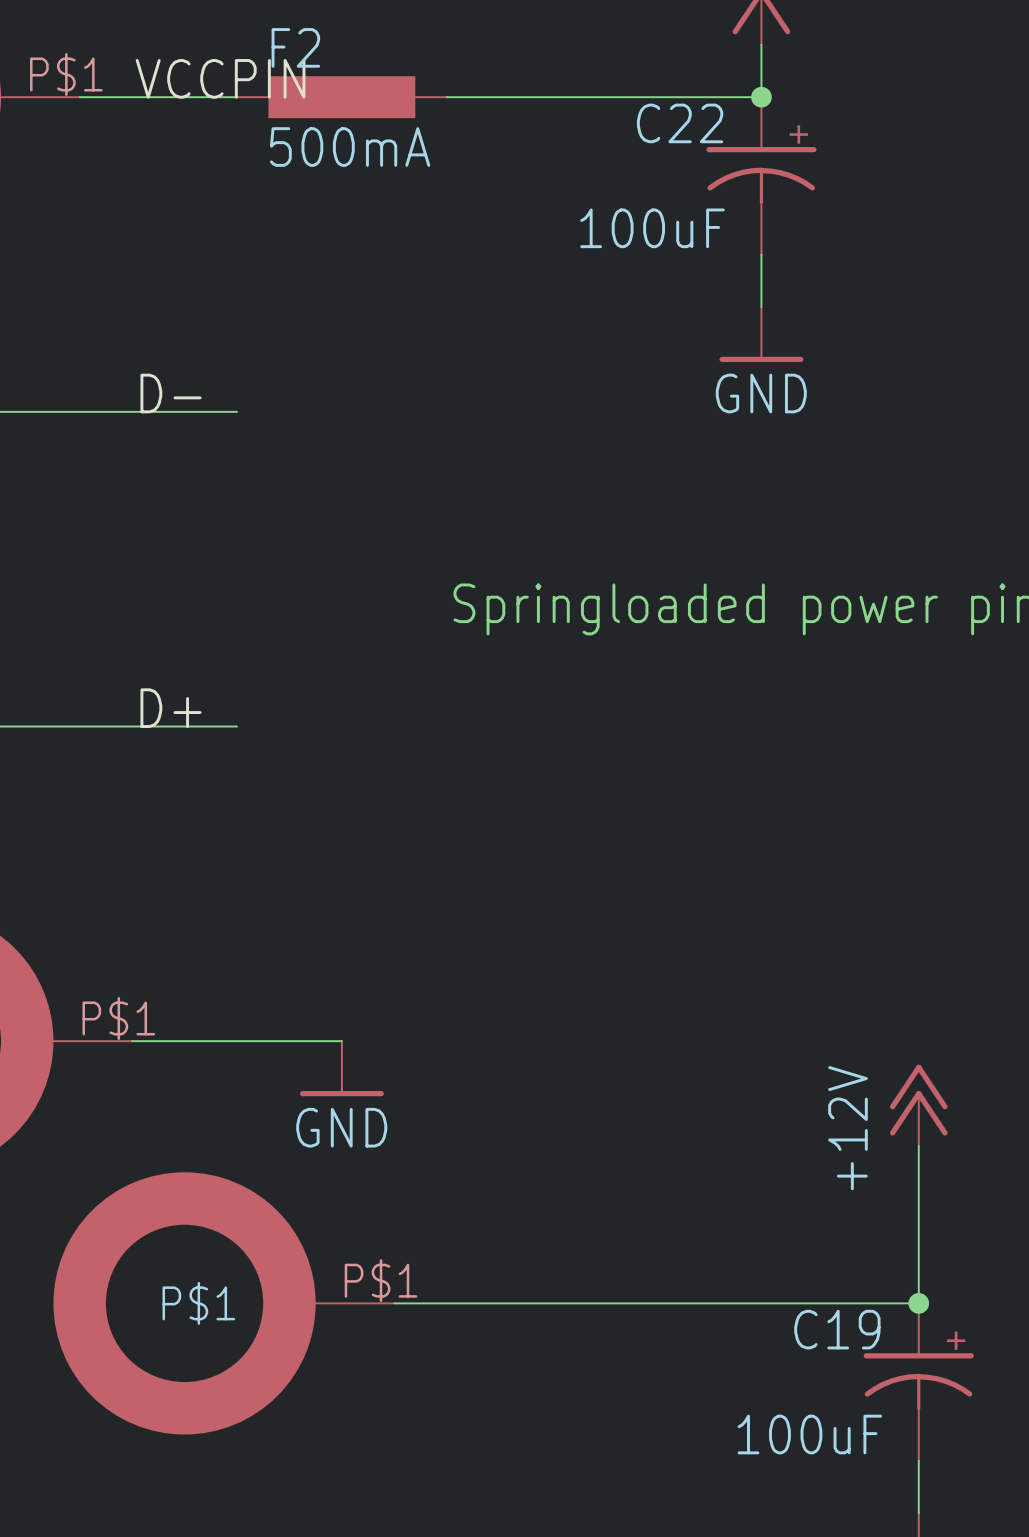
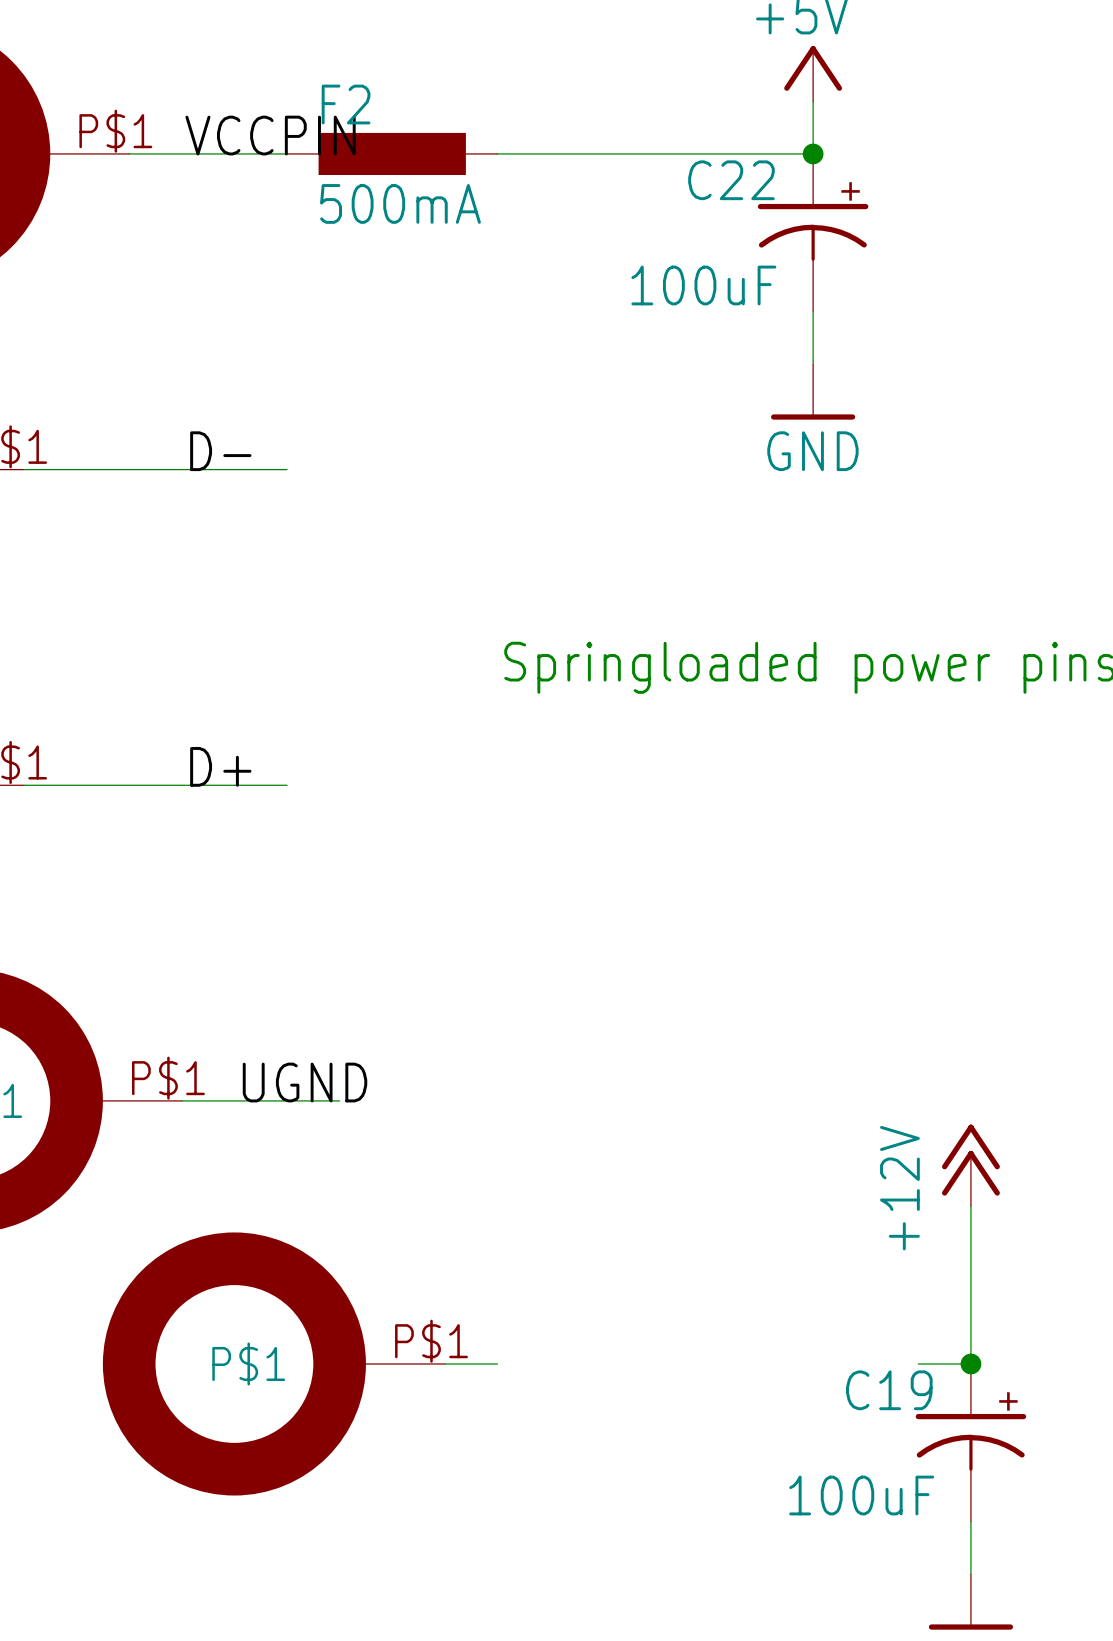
label: none -> UGND (305, 1082)
wire: (289, 1041) (341, 1041) -> none
power symbol: GND (341, 1068) -> none
wire: (446, 1303) (866, 1303) -> none

